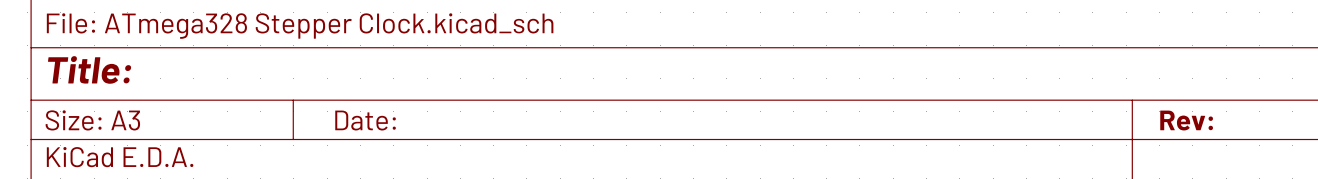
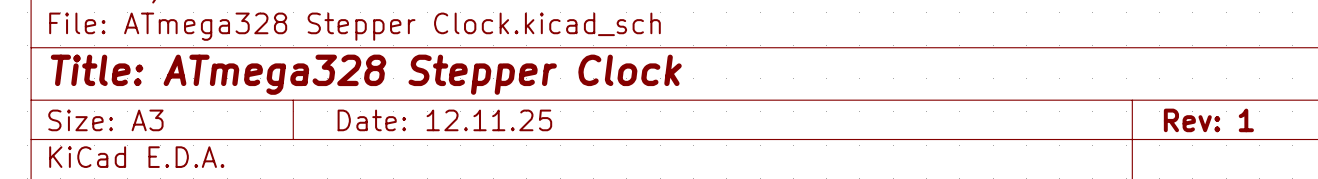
title block: Title: (89, 69) -> Title: ATmega328 Stepper Clock (366, 74)
title block: Date: (365, 120) -> Date: 12.11.25 (444, 120)
title block: Rev: (1186, 120) -> Rev: 1 (1208, 120)

